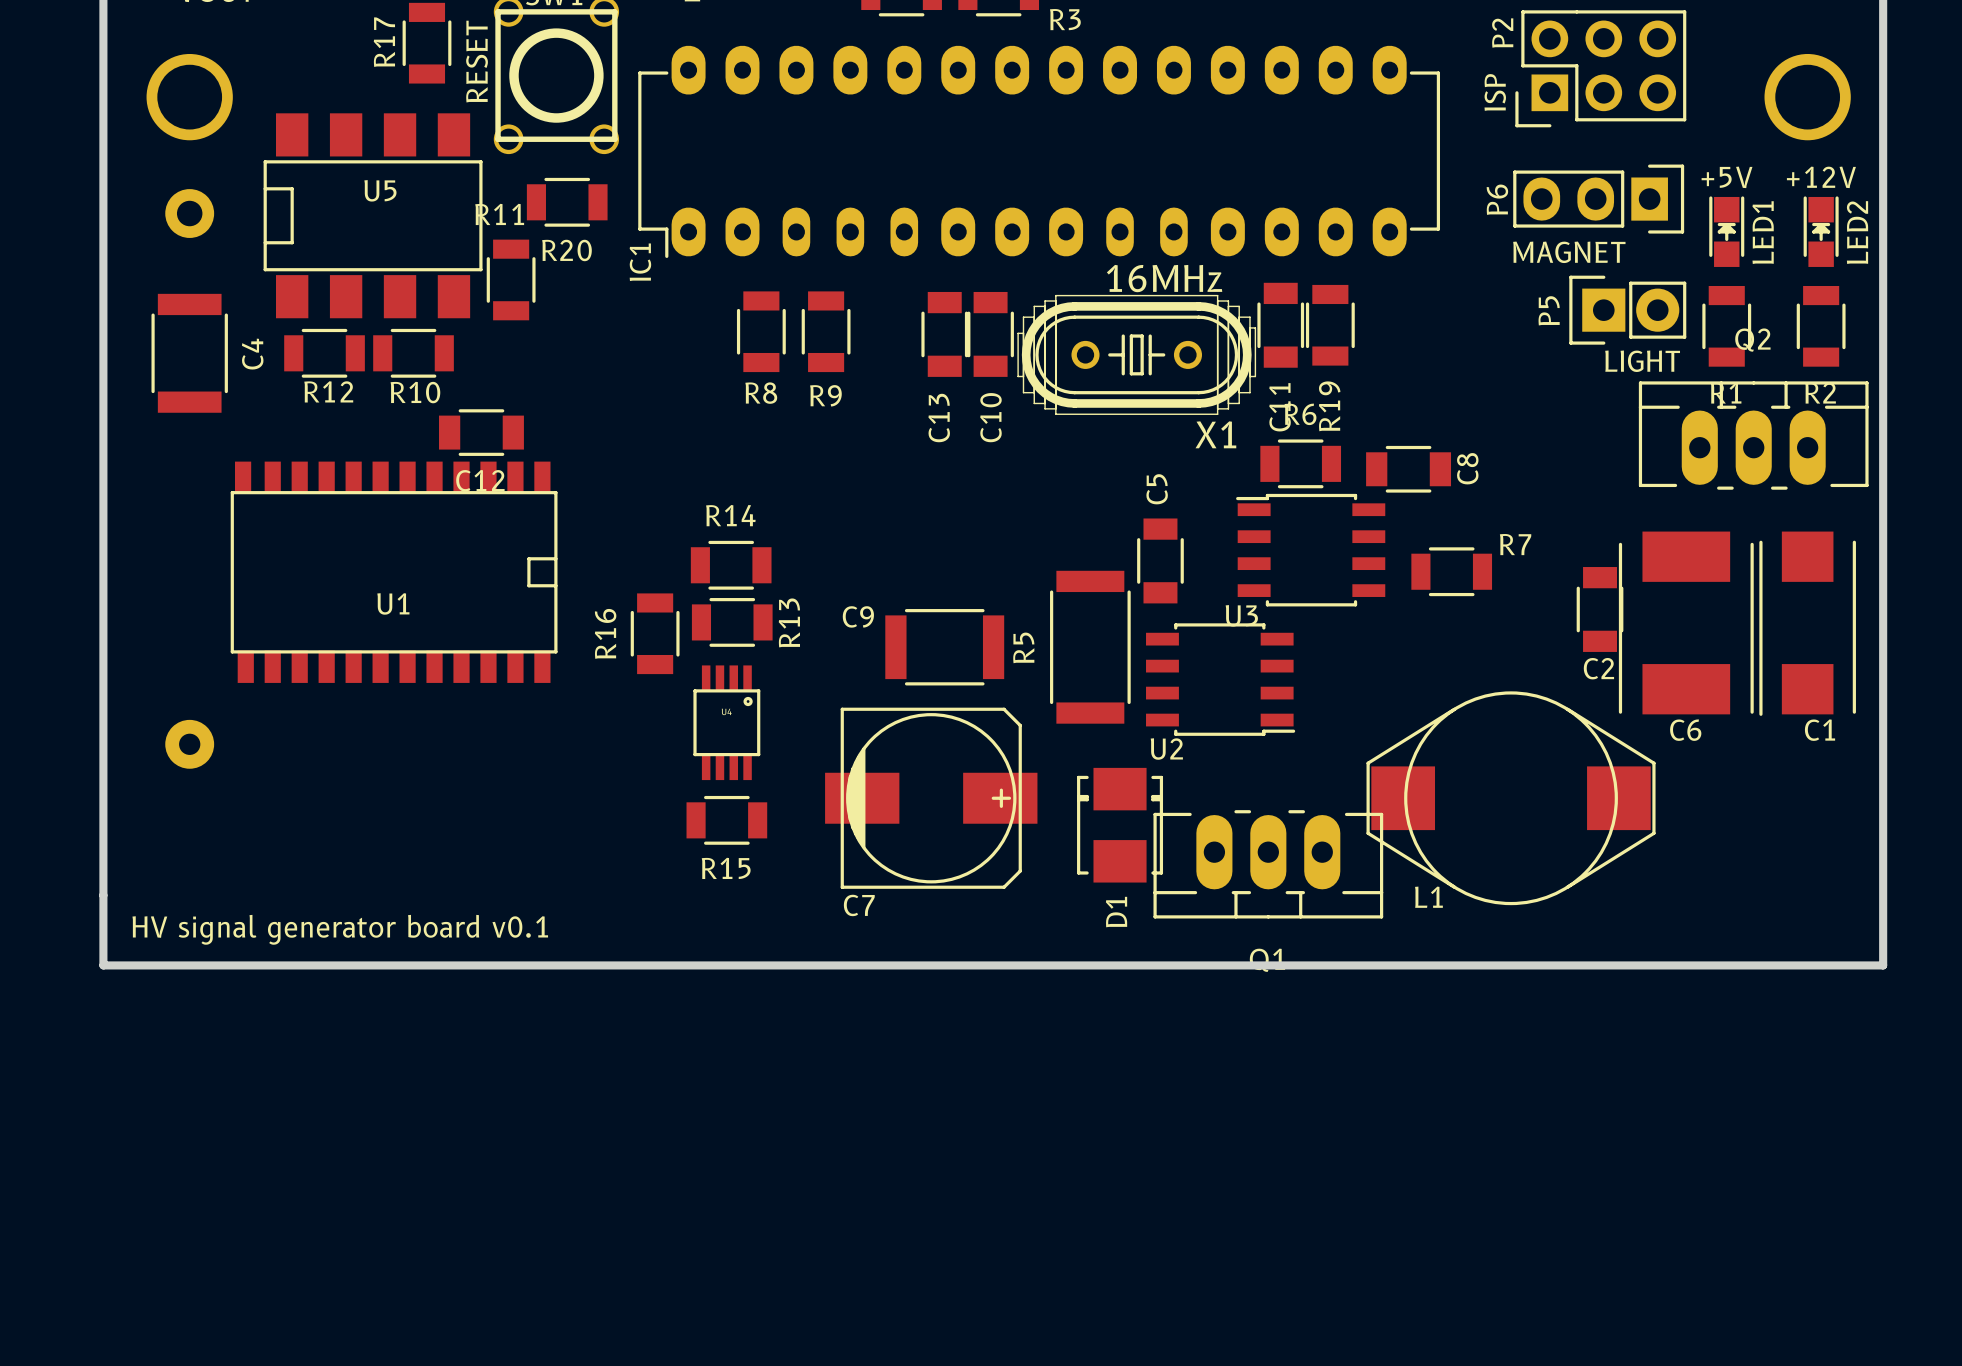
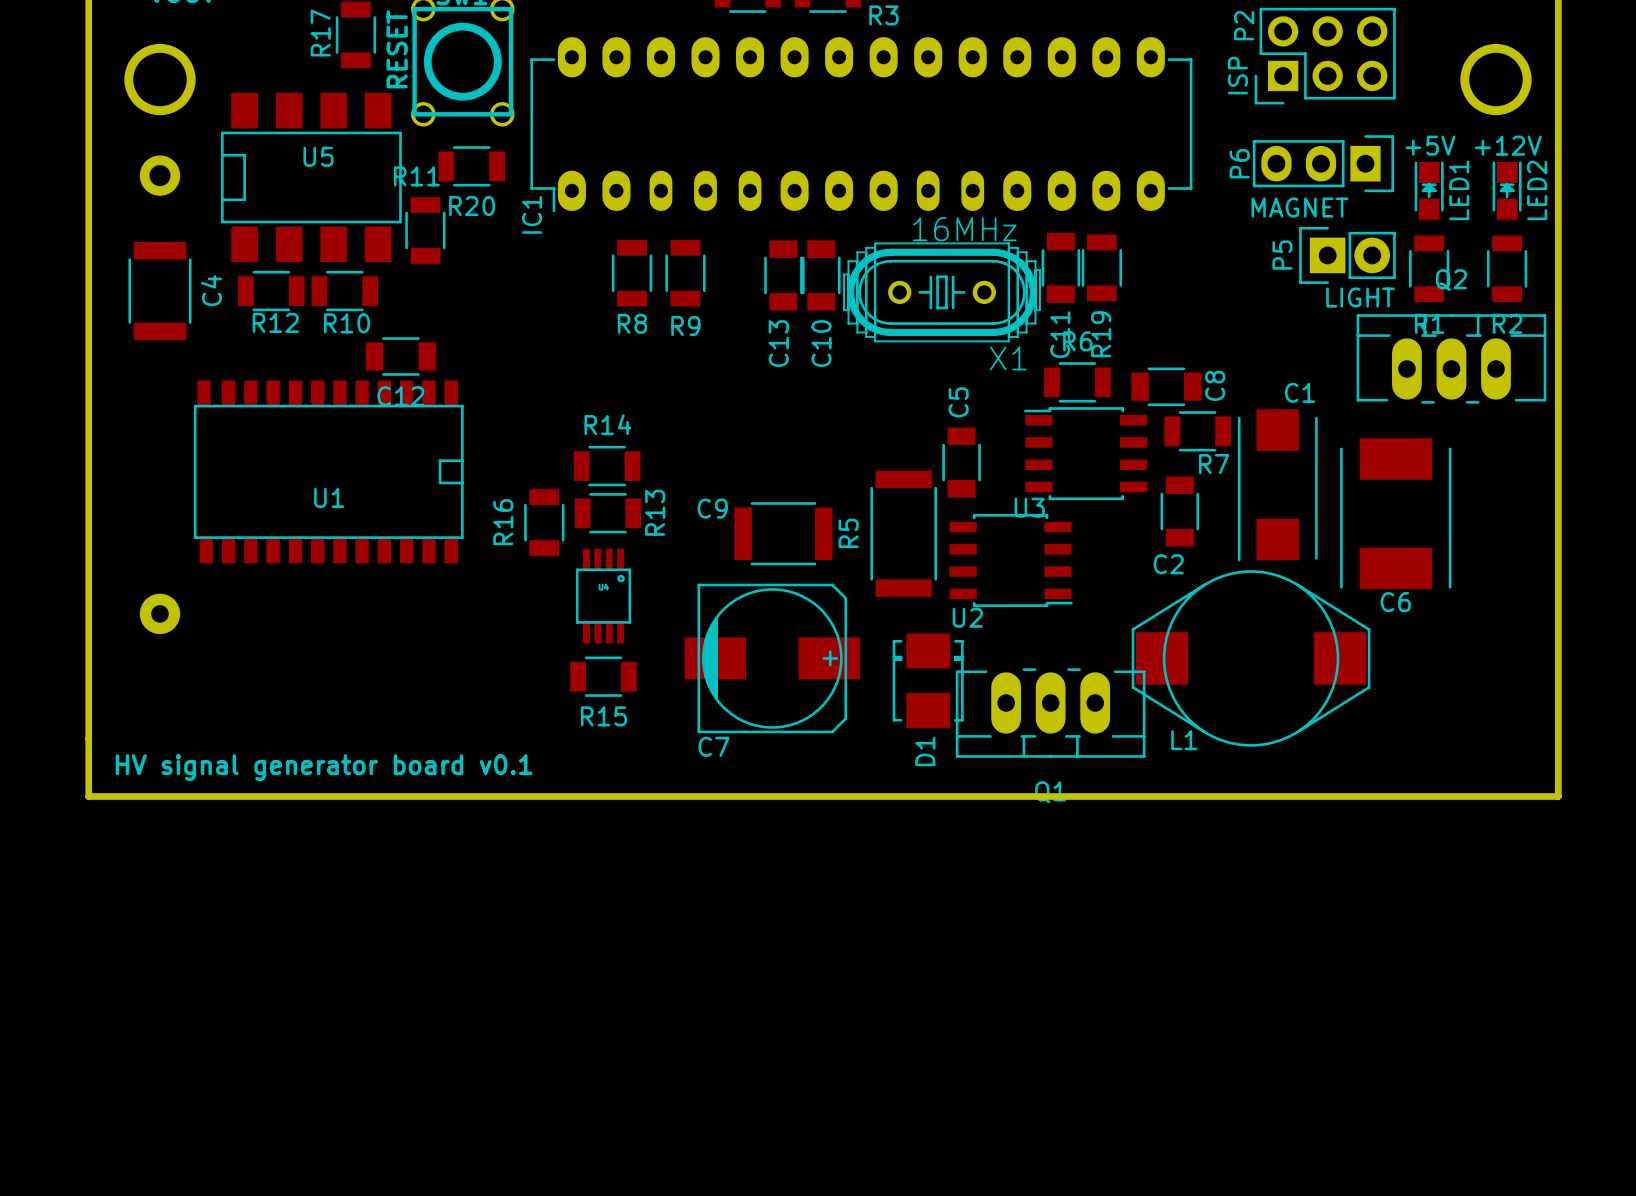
R7 name position: R7 (1515, 544) -> R7 (1214, 464)
R7 position: (1451, 571) -> (1197, 431)
C2 position: (1600, 609) -> (1179, 511)
C1 position: (1807, 623) -> (1277, 485)
C2 name position: C2 (1598, 668) -> C2 (1168, 564)
C1 name position: C1 (1820, 730) -> C1 (1300, 392)

